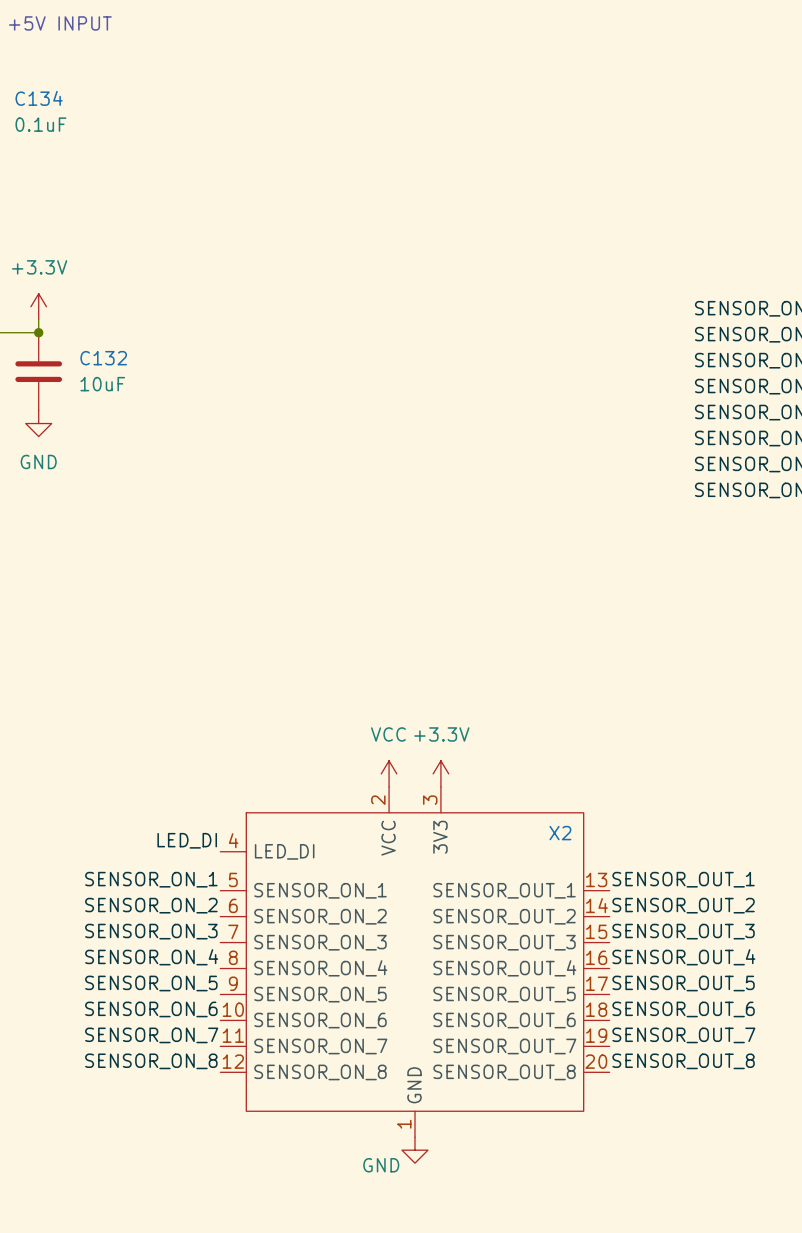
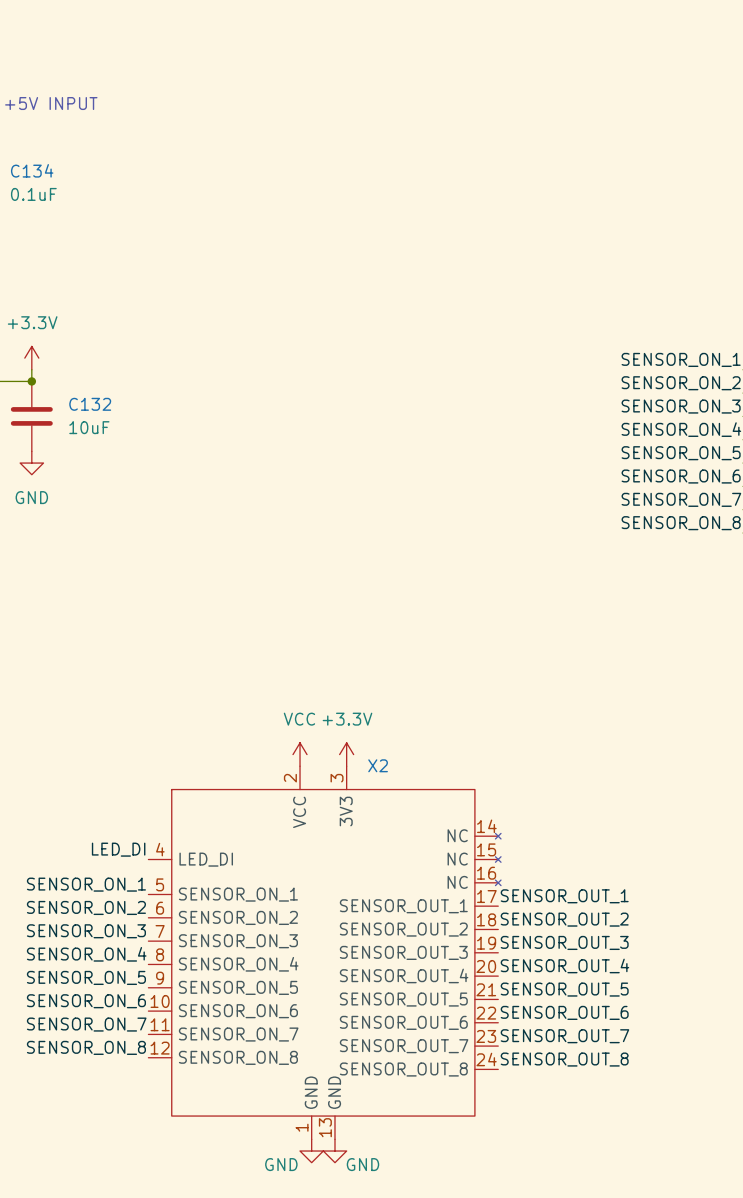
power symbol position: VCC (389, 773) -> VCC (300, 754)
power symbol position: +3.3V (440, 773) -> +3.3V (346, 754)
X2 symbol: [220, 786, 610, 1138] -> [148, 766, 501, 1140]
X2 name position: X2 (560, 833) -> X2 (378, 765)
label position: LED_DI (187, 840) -> LED_DI (118, 849)
label position: SENSOR_ON_1 (151, 879) -> SENSOR_ON_1 (86, 884)
label position: SENSOR_OUT_1 (683, 879) -> SENSOR_OUT_1 (564, 896)
label position: SENSOR_ON_2 (151, 905) -> SENSOR_ON_2 (86, 907)
label position: SENSOR_OUT_2 (683, 905) -> SENSOR_OUT_2 (564, 919)
label position: SENSOR_ON_3 (151, 931) -> SENSOR_ON_3 (86, 931)
label position: SENSOR_OUT_3 (683, 931) -> SENSOR_OUT_3 (564, 942)
label position: SENSOR_ON_4 (151, 957) -> SENSOR_ON_4 (86, 954)
label position: SENSOR_OUT_4 (683, 957) -> SENSOR_OUT_4 (564, 965)
label position: SENSOR_ON_5 (151, 983) -> SENSOR_ON_5 (86, 977)
label position: SENSOR_OUT_5 (683, 983) -> SENSOR_OUT_5 (564, 989)
label position: SENSOR_ON_6 (151, 1009) -> SENSOR_ON_6 (86, 1001)
label position: SENSOR_OUT_6 (683, 1009) -> SENSOR_OUT_6 (564, 1012)
label position: SENSOR_ON_7 (151, 1035) -> SENSOR_ON_7 (86, 1024)
label position: SENSOR_OUT_7 (683, 1035) -> SENSOR_OUT_7 (564, 1036)
label position: SENSOR_ON_8 (151, 1061) -> SENSOR_ON_8 (86, 1047)
label position: SENSOR_OUT_8 (683, 1061) -> SENSOR_OUT_8 (564, 1059)
power symbol: GND (414, 1150) -> none
power symbol: none -> GND (311, 1151)
power symbol: none -> GND (334, 1151)

